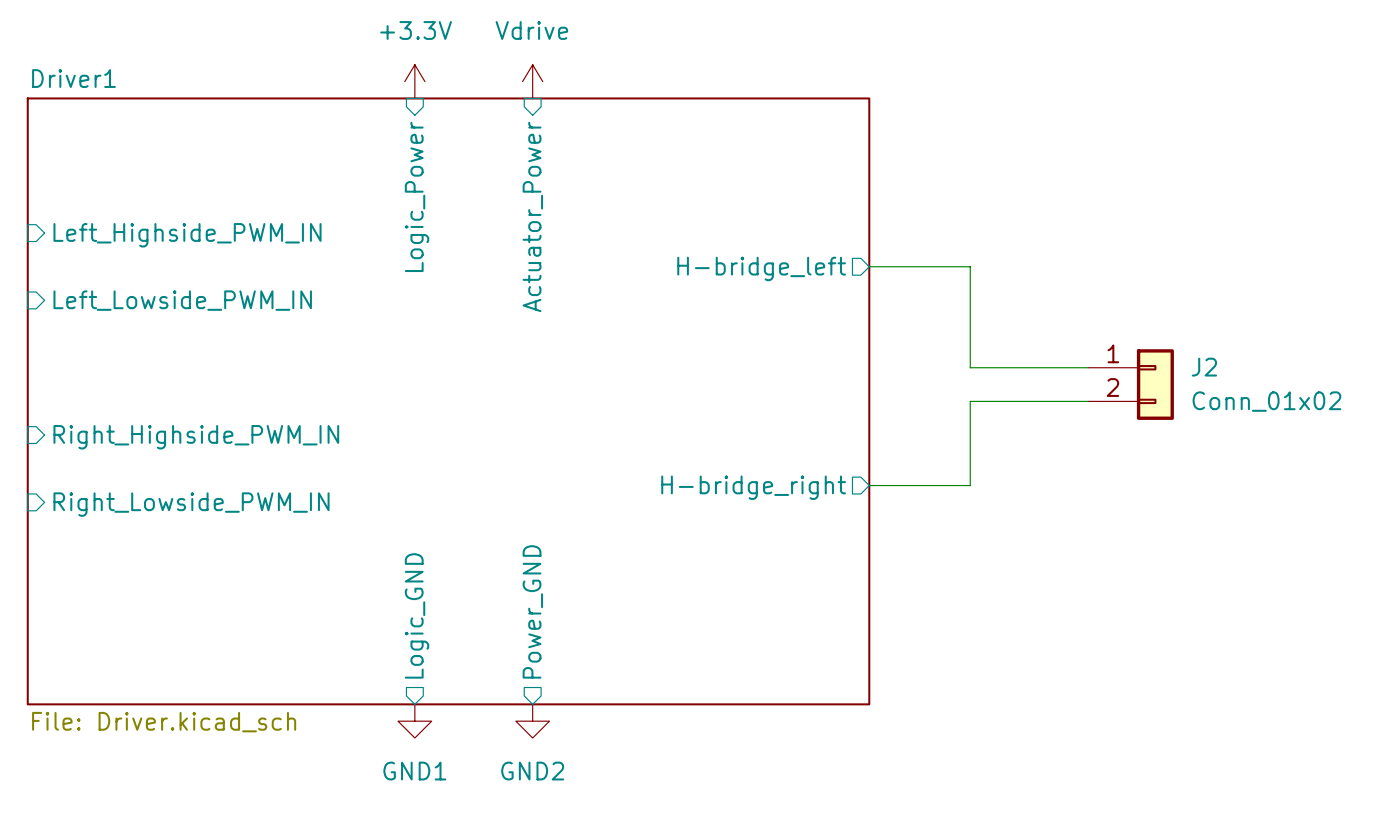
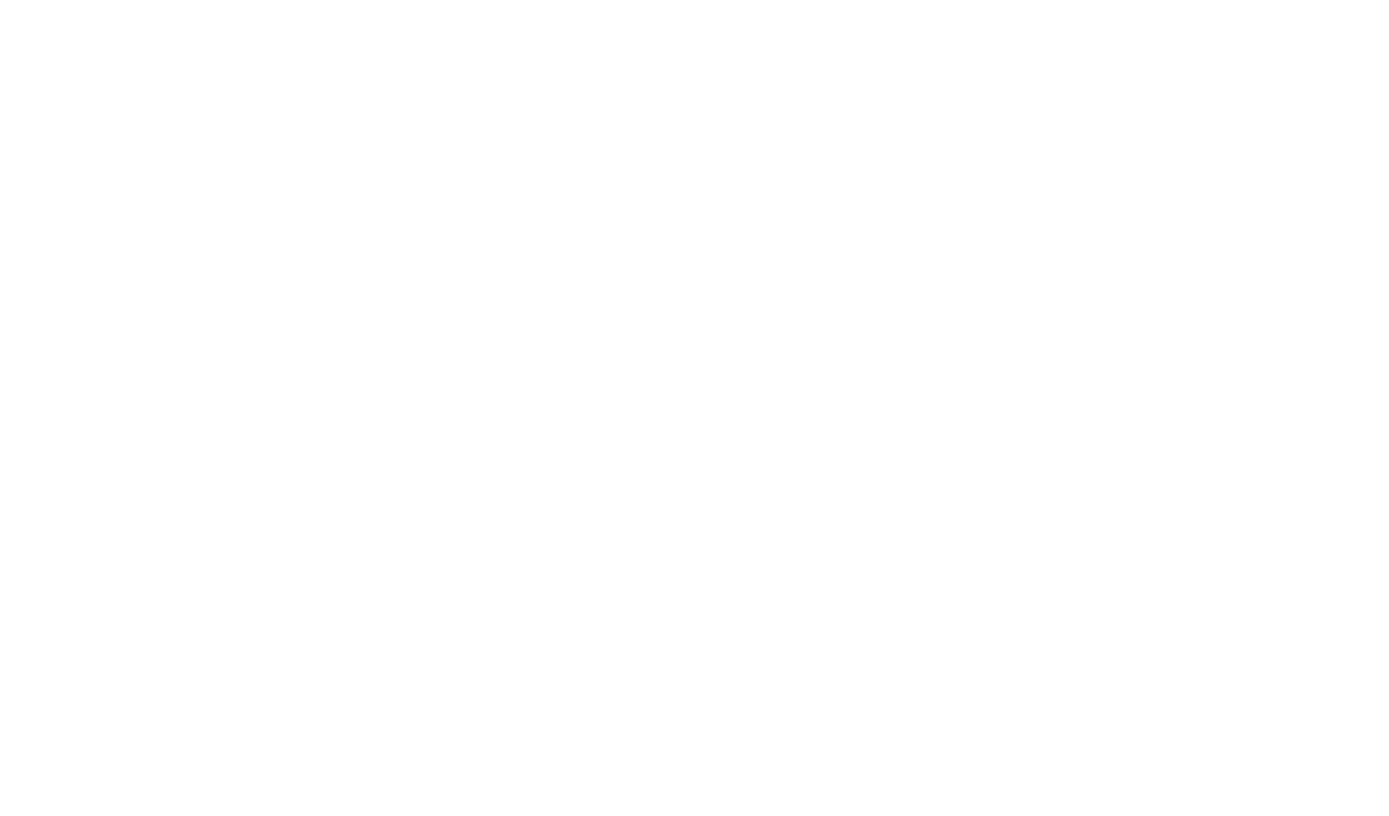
power symbol: +3.3V (414, 81) -> none
power symbol: Vdrive (532, 81) -> none
sheet pin: Logic_Power (417, 196) -> none
sheet pin: Actuator_Power (532, 216) -> none
sheet pin: Left_Highside_PWM_IN (187, 235) -> none
wire: (869, 266) (970, 266) (970, 367) (1088, 367) -> none
sheet pin: H-bridge_left (761, 268) -> none
sheet pin: Left_Lowside_PWM_IN (182, 300) -> none
J2: Conn_01x02 (1131, 384) -> none
sheet Driver1: File: Driver.kicad_sch (448, 401) -> none
wire: (1088, 401) (970, 401) (970, 485) (869, 485) -> none
sheet pin: Right_Highside_PWM_IN (196, 437) -> none
sheet pin: H-bridge_right (753, 487) -> none
sheet pin: Right_Lowside_PWM_IN (191, 504) -> none
sheet pin: Power_GND (532, 611) -> none
sheet pin: Logic_GND (417, 615) -> none
power symbol: GND1 (414, 721) -> none
power symbol: GND2 (532, 721) -> none

